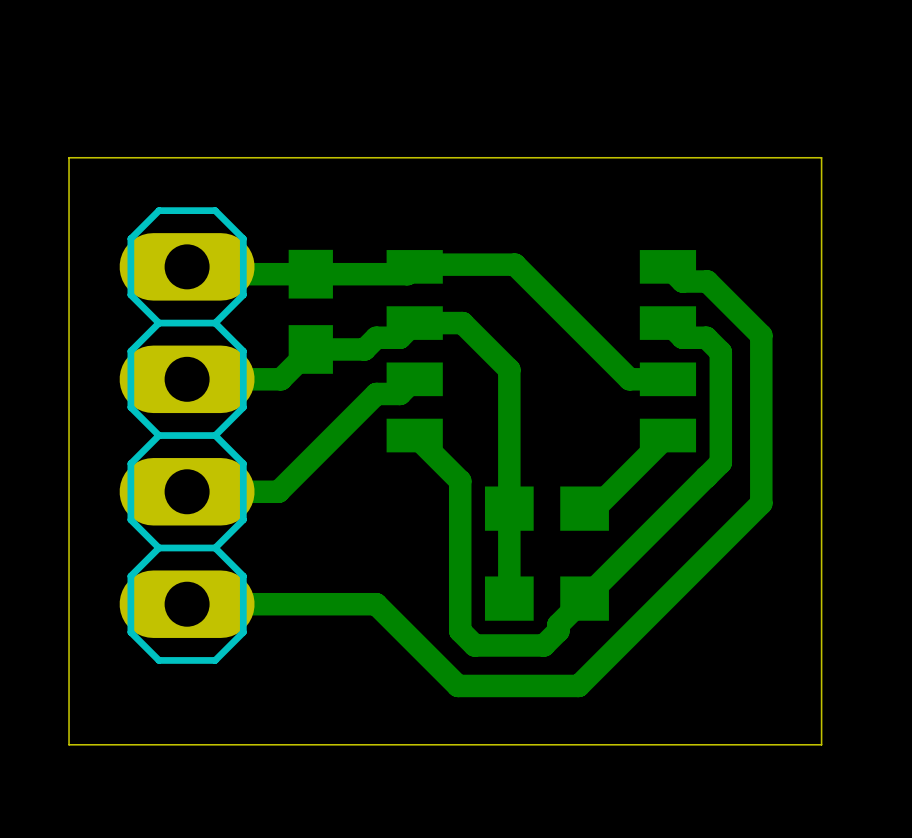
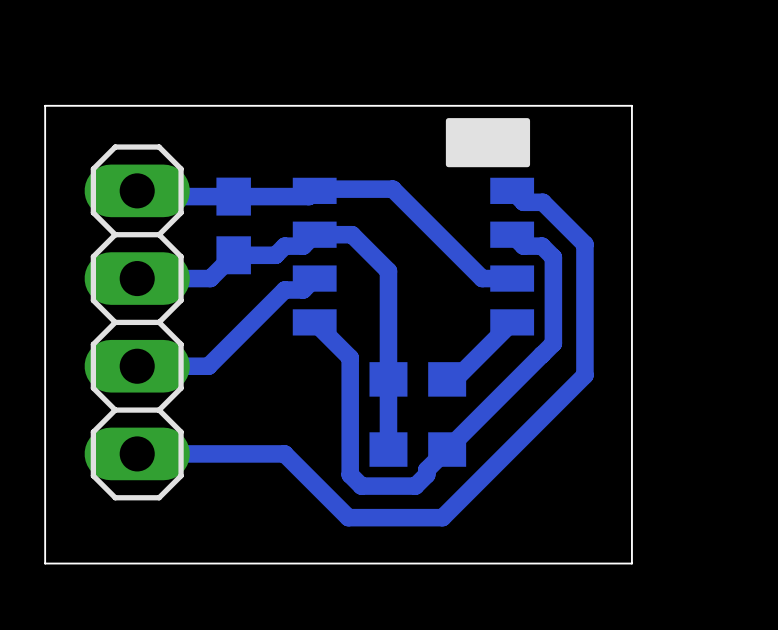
drawing: none -> [445, 118, 531, 168]

